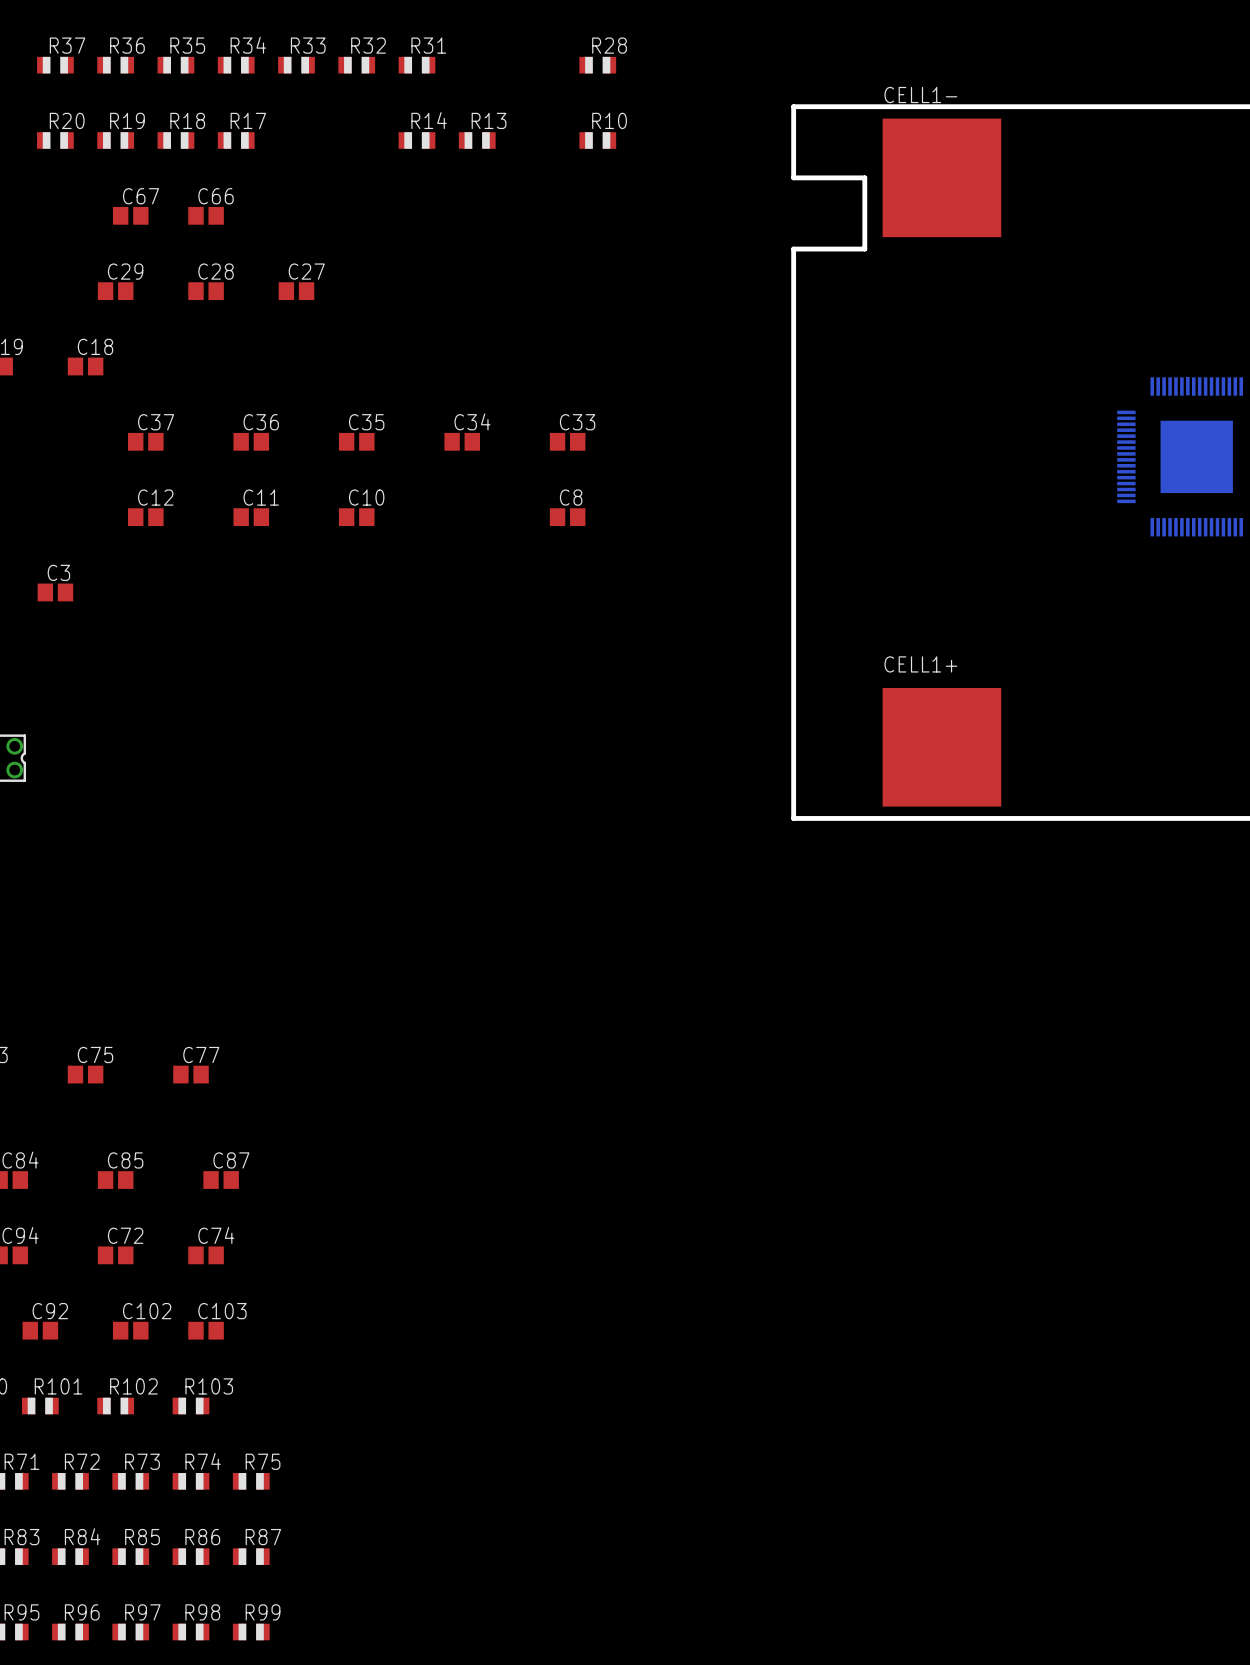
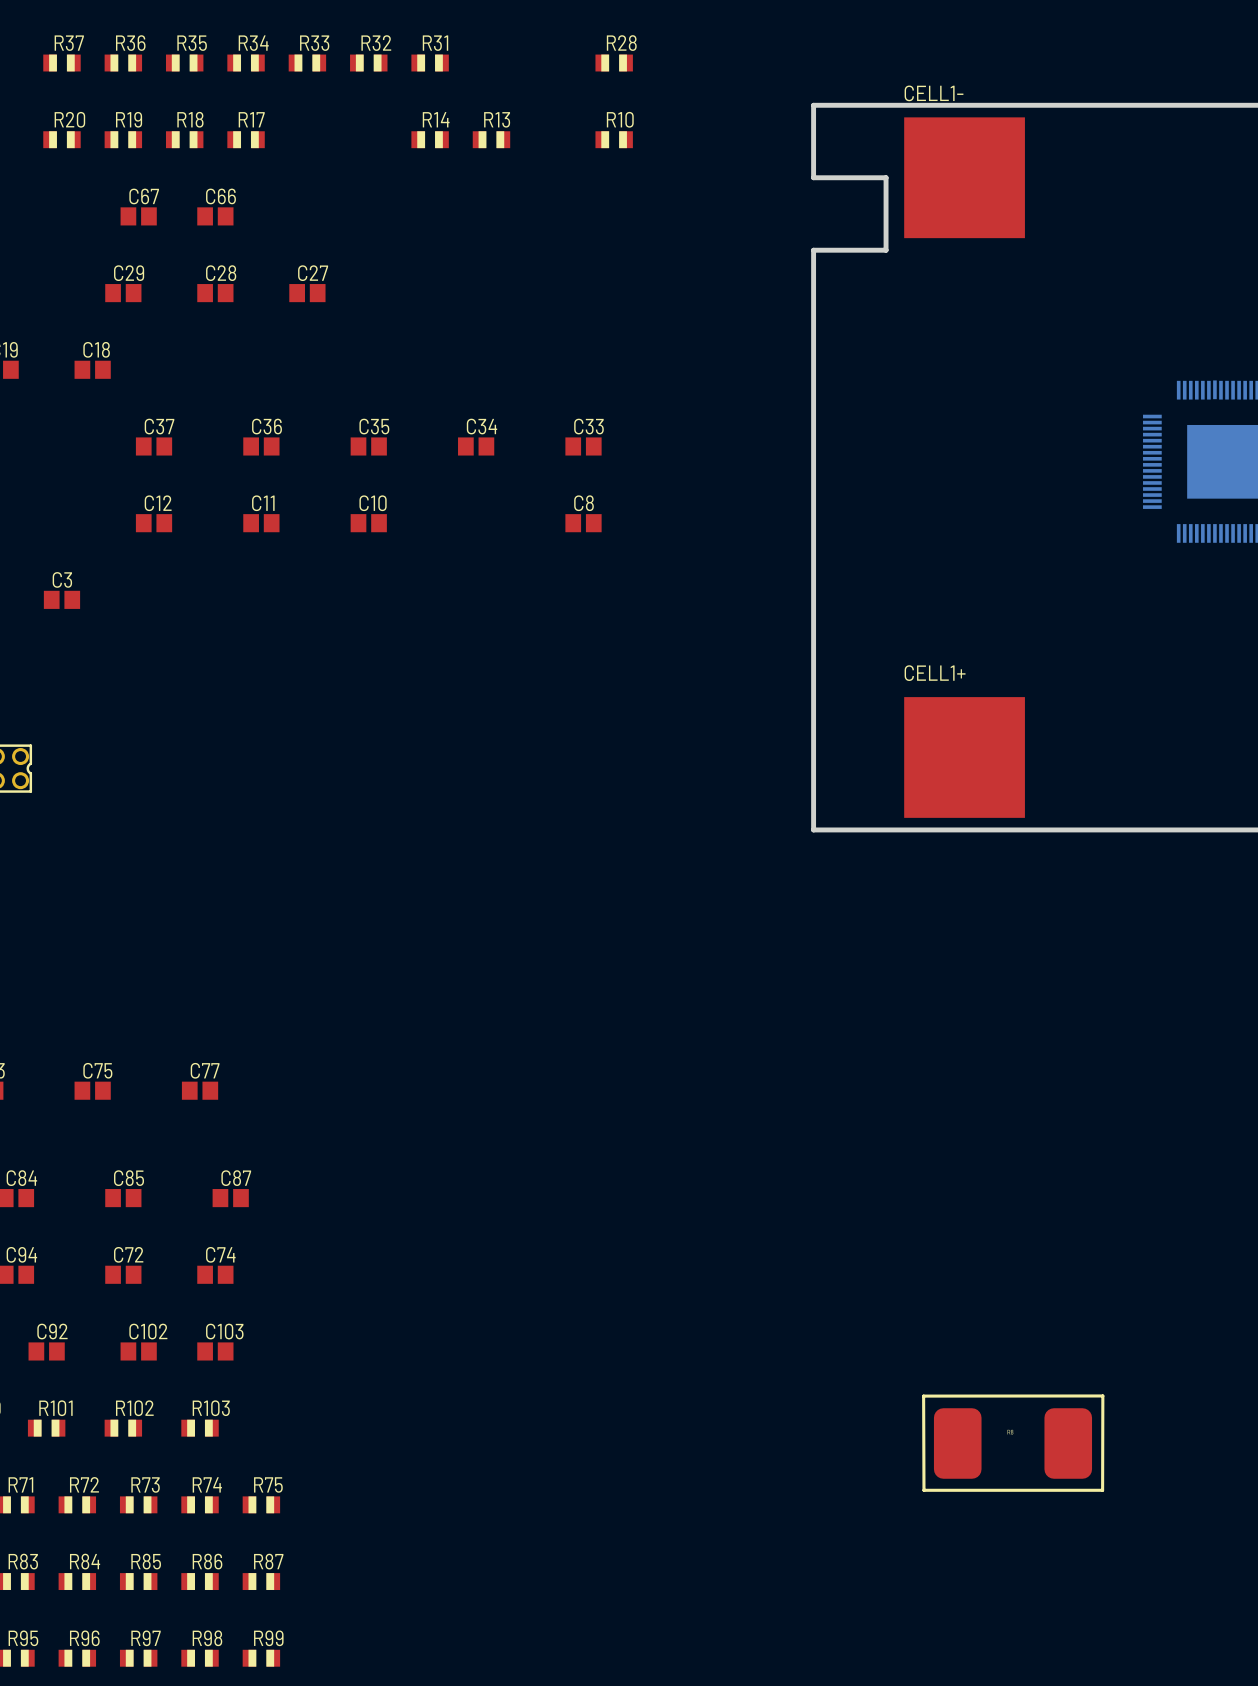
part: none -> (1013, 1443)

